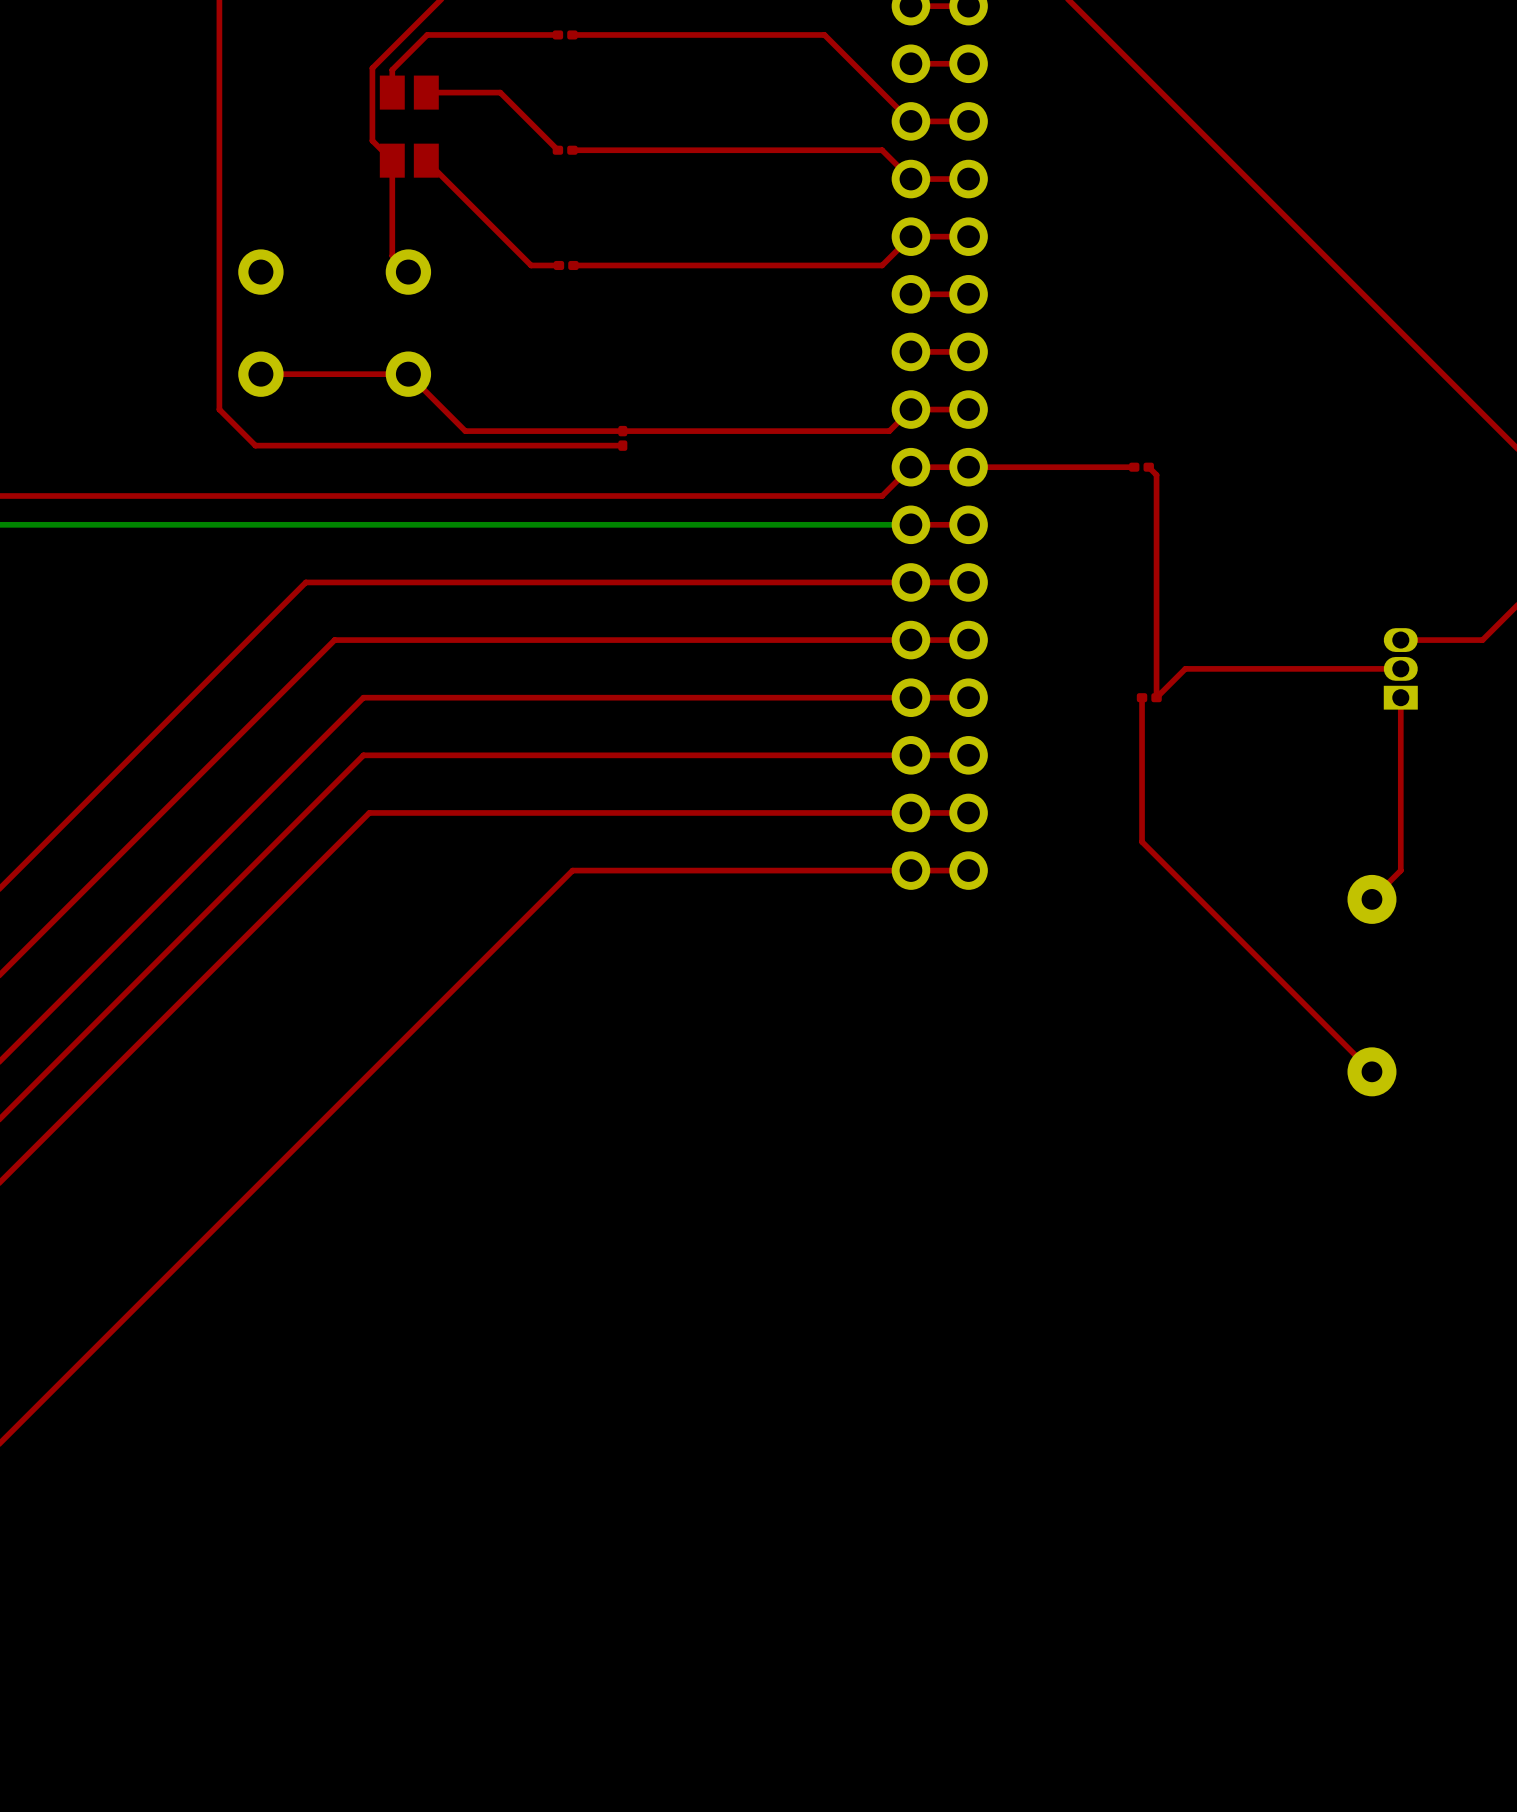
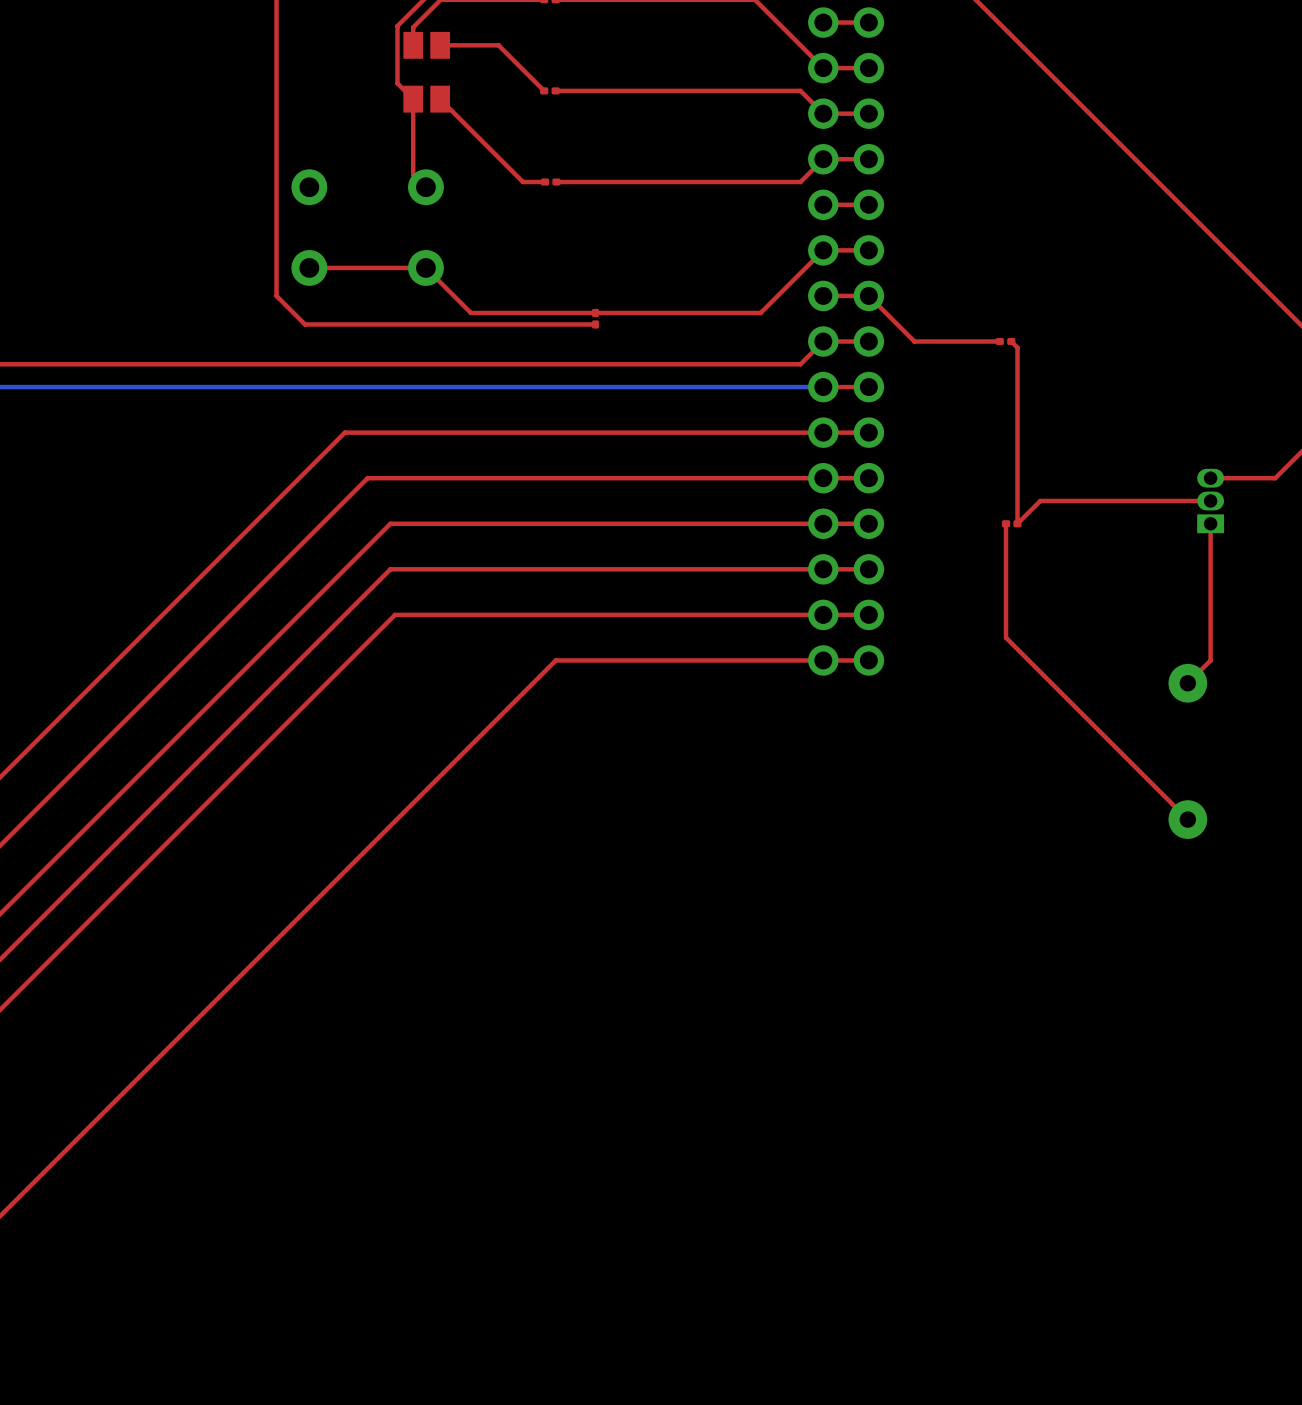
top track: (910, 409) (889, 431) (831, 431) -> (823, 250) (760, 312)
top track: (1026, 467) (968, 467) -> (914, 341) (874, 301)

